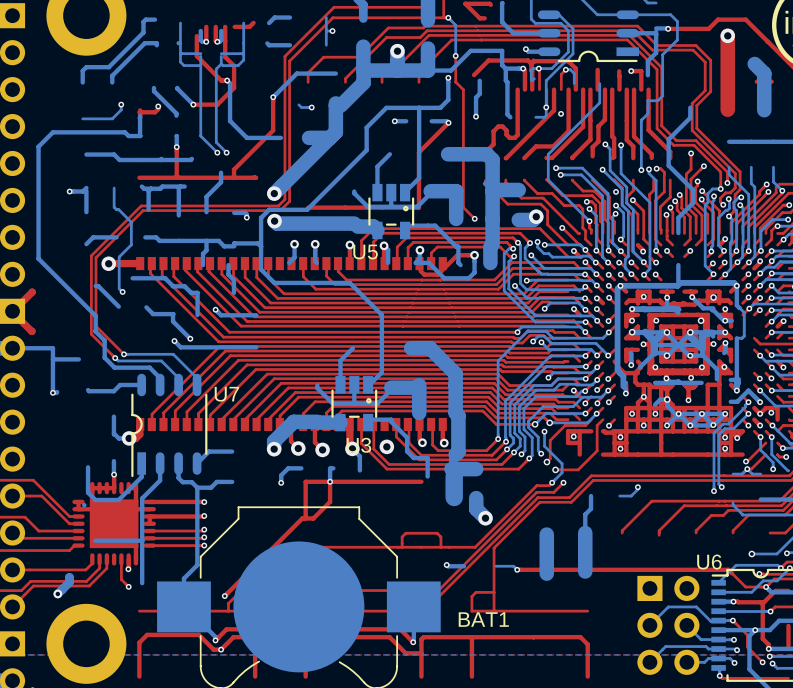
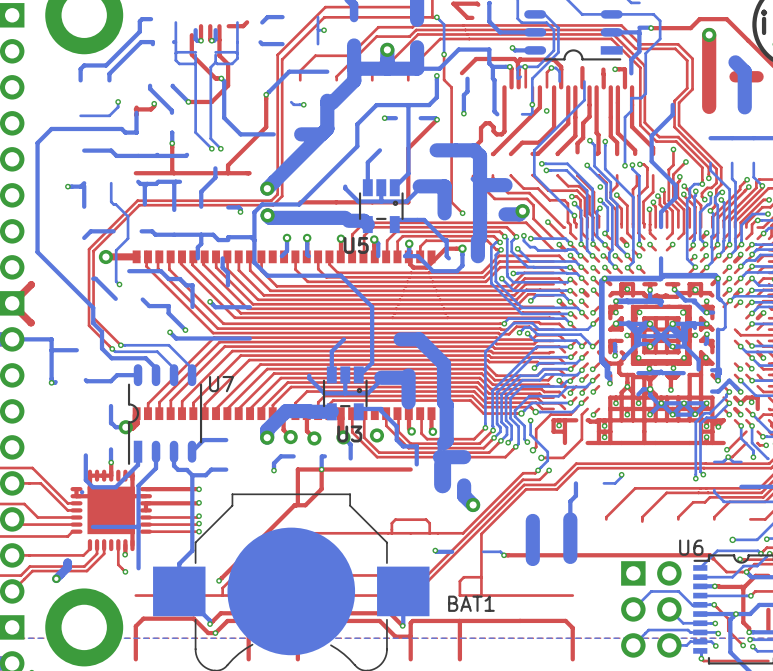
top track: none -> (758, 76) (735, 76)

